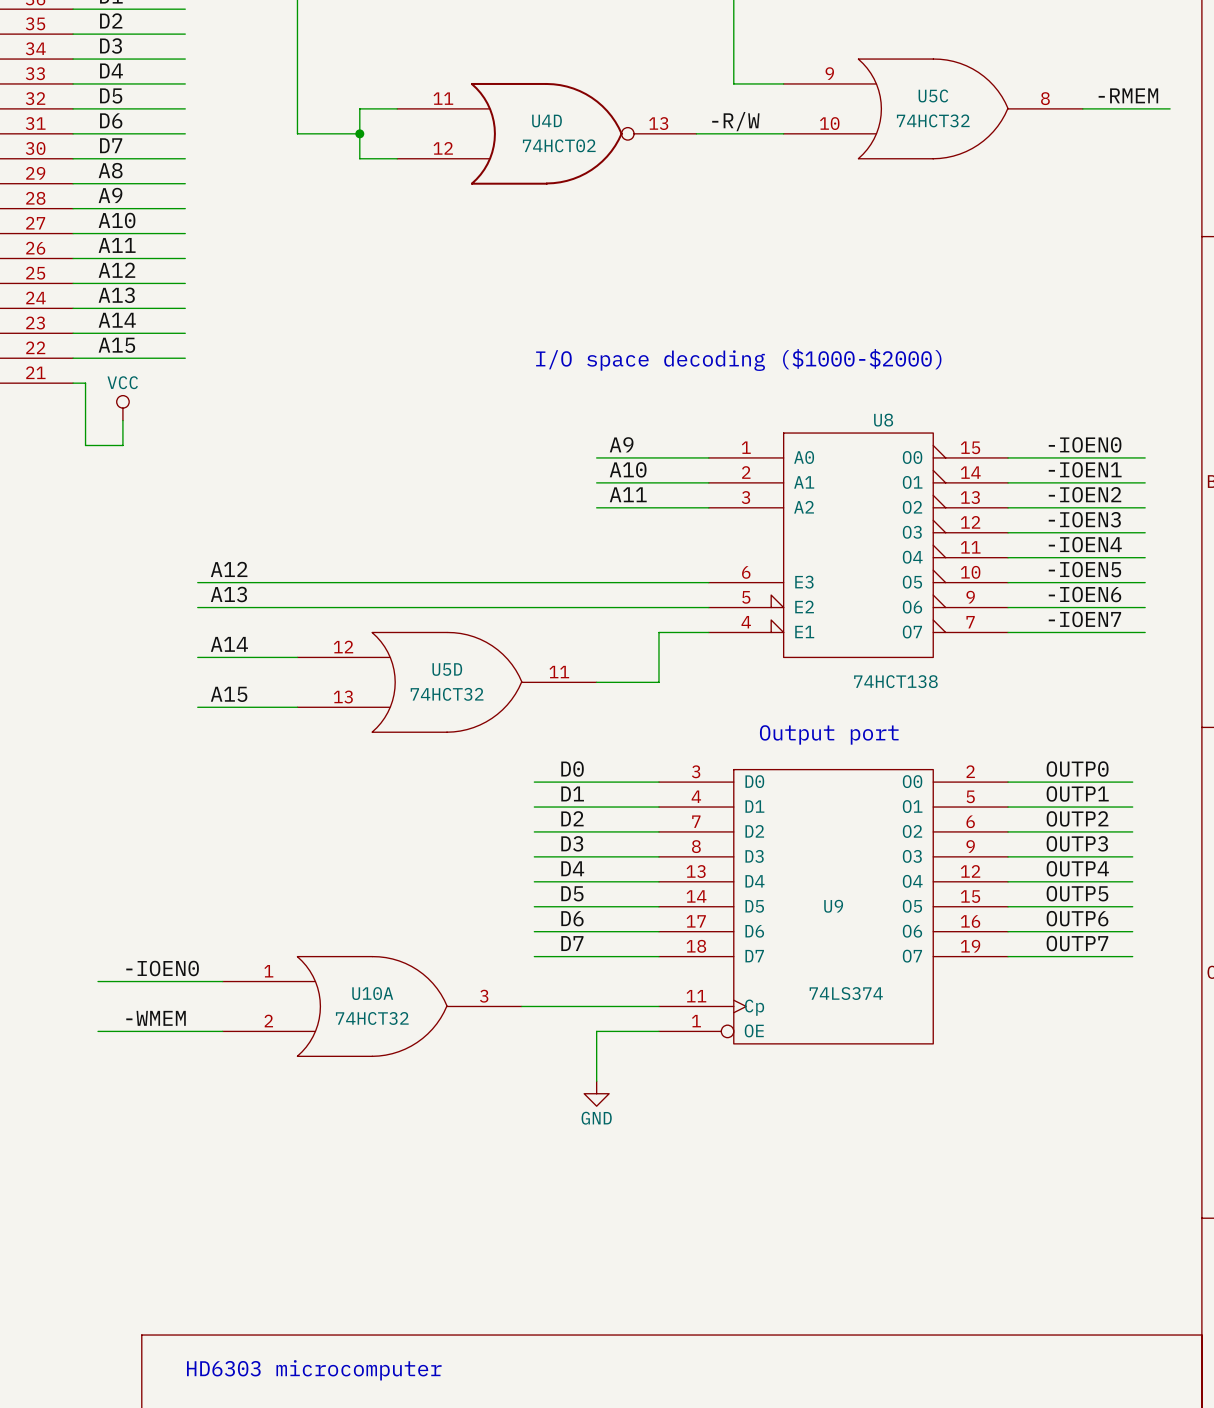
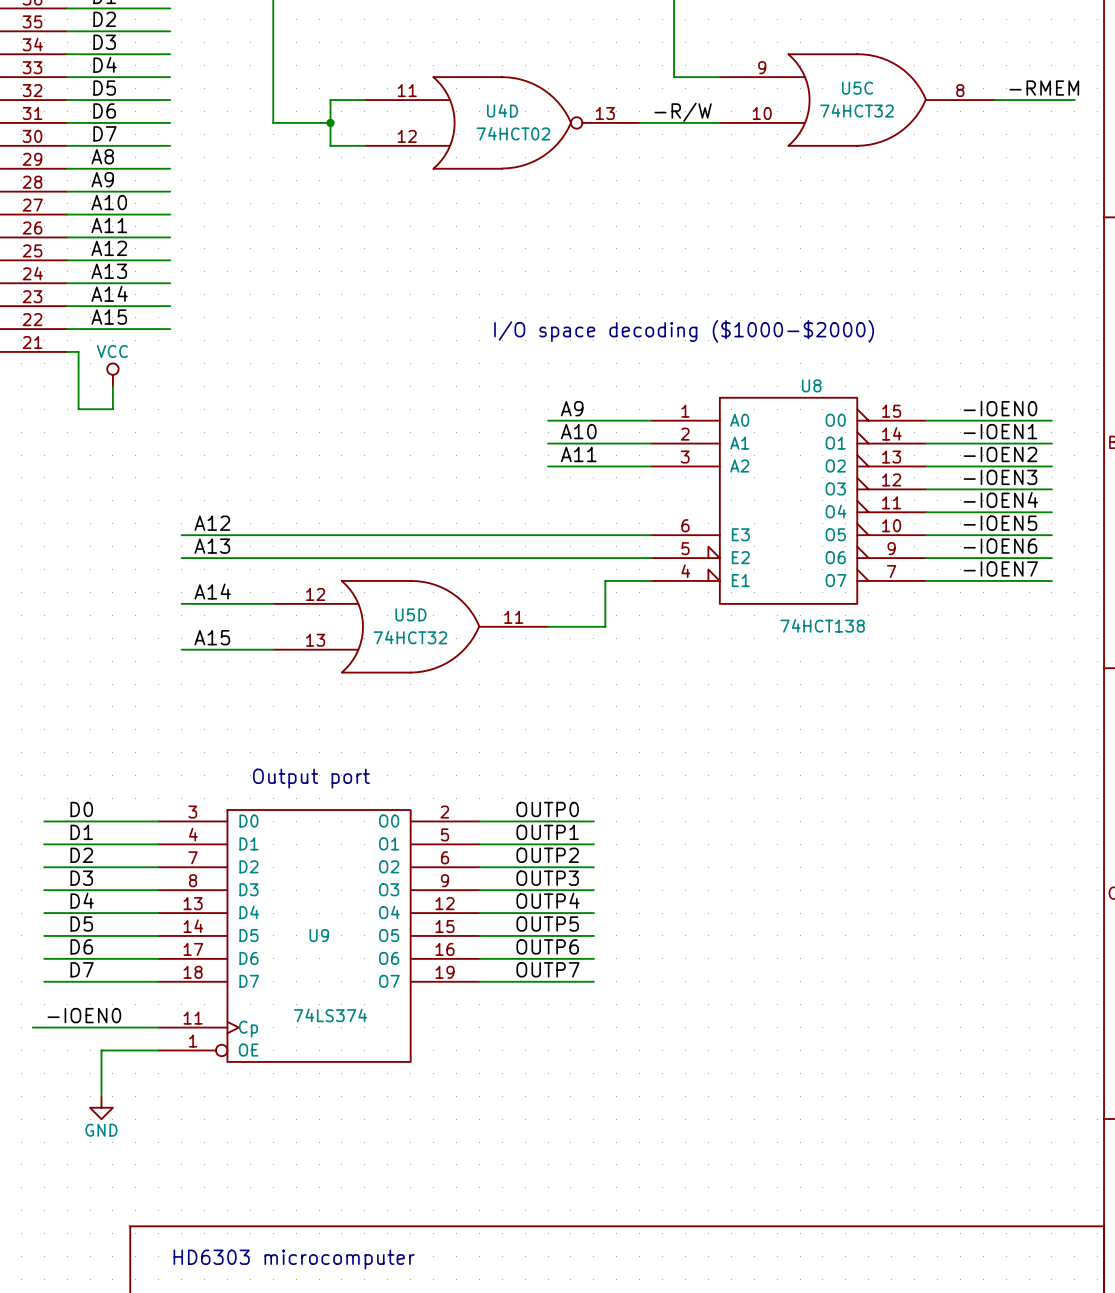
text: Output port (829, 734) -> none
label: D0 (572, 769) -> none
label: OUTP0 (1077, 769) -> none
wire: (534, 782) (658, 782) -> (479, 821) (593, 821)
wire: (1008, 782) (1132, 782) -> none
label: D1 (572, 793) -> none
label: OUTP1 (1077, 793) -> none
wire: (534, 807) (658, 807) -> (479, 844) (593, 844)
wire: (1008, 807) (1132, 807) -> none
label: D2 (572, 818) -> none
label: OUTP2 (1077, 818) -> none
wire: (534, 831) (658, 831) -> (479, 867) (593, 867)
wire: (1008, 831) (1132, 831) -> none
label: D3 (572, 843) -> none
label: OUTP3 (1077, 843) -> none
text: none -> Output port (311, 778)
wire: (534, 856) (658, 856) -> (479, 890) (593, 890)
wire: (1008, 856) (1132, 856) -> none
label: D4 (572, 868) -> none
label: OUTP4 (1077, 868) -> none
label: none -> D0 (81, 809)
wire: (534, 881) (658, 881) -> (479, 913) (593, 913)
label: none -> OUTP0 (547, 809)
wire: (1008, 881) (1132, 881) -> none
label: D5 (572, 893) -> none
label: OUTP5 (1077, 893) -> none
wire: none -> (44, 821) (158, 821)
label: none -> D1 (81, 832)
wire: (534, 906) (658, 906) -> (479, 935) (593, 935)
label: none -> OUTP1 (547, 832)
U9 position: (833, 906) -> (319, 935)
wire: (1008, 906) (1132, 906) -> none
label: D6 (572, 918) -> none
label: OUTP6 (1077, 918) -> none
wire: none -> (44, 844) (158, 844)
label: none -> D2 (81, 855)
wire: (534, 931) (658, 931) -> (479, 958) (593, 958)
label: none -> OUTP2 (547, 855)
wire: (1008, 931) (1132, 931) -> none
label: D7 (572, 943) -> none
label: OUTP7 (1077, 943) -> none
wire: none -> (44, 867) (158, 867)
label: none -> D3 (81, 878)
wire: (534, 956) (658, 956) -> (479, 981) (593, 981)
label: none -> OUTP3 (547, 878)
wire: (1008, 956) (1132, 956) -> none
label position: -IOEN0 (162, 968) -> -IOEN0 (84, 1015)
label: none -> D4 (82, 900)
label: none -> OUTP4 (547, 900)
wire: (98, 981) (222, 981) -> (44, 890) (158, 890)
wire: none -> (44, 913) (158, 913)
label: none -> OUTP5 (547, 923)
label: none -> D5 (81, 923)
U10A: 74HCT32 (372, 1006) -> none
wire: (521, 1006) (658, 1006) -> none
label: -WMEM (156, 1018) -> none
label: none -> D6 (81, 946)
label: none -> OUTP6 (547, 946)
wire: (98, 1031) (222, 1031) -> (44, 935) (158, 935)
wire: (658, 1031) (596, 1031) (596, 1081) -> none
wire: none -> (44, 958) (158, 958)
label: none -> D7 (82, 969)
label: none -> OUTP7 (547, 969)
wire: none -> (44, 981) (158, 981)
power symbol: GND (596, 1093) -> none
wire: none -> (32, 1027) (158, 1027)
wire: none -> (158, 1050) (101, 1050) (101, 1096)
power symbol: none -> GND (101, 1107)

